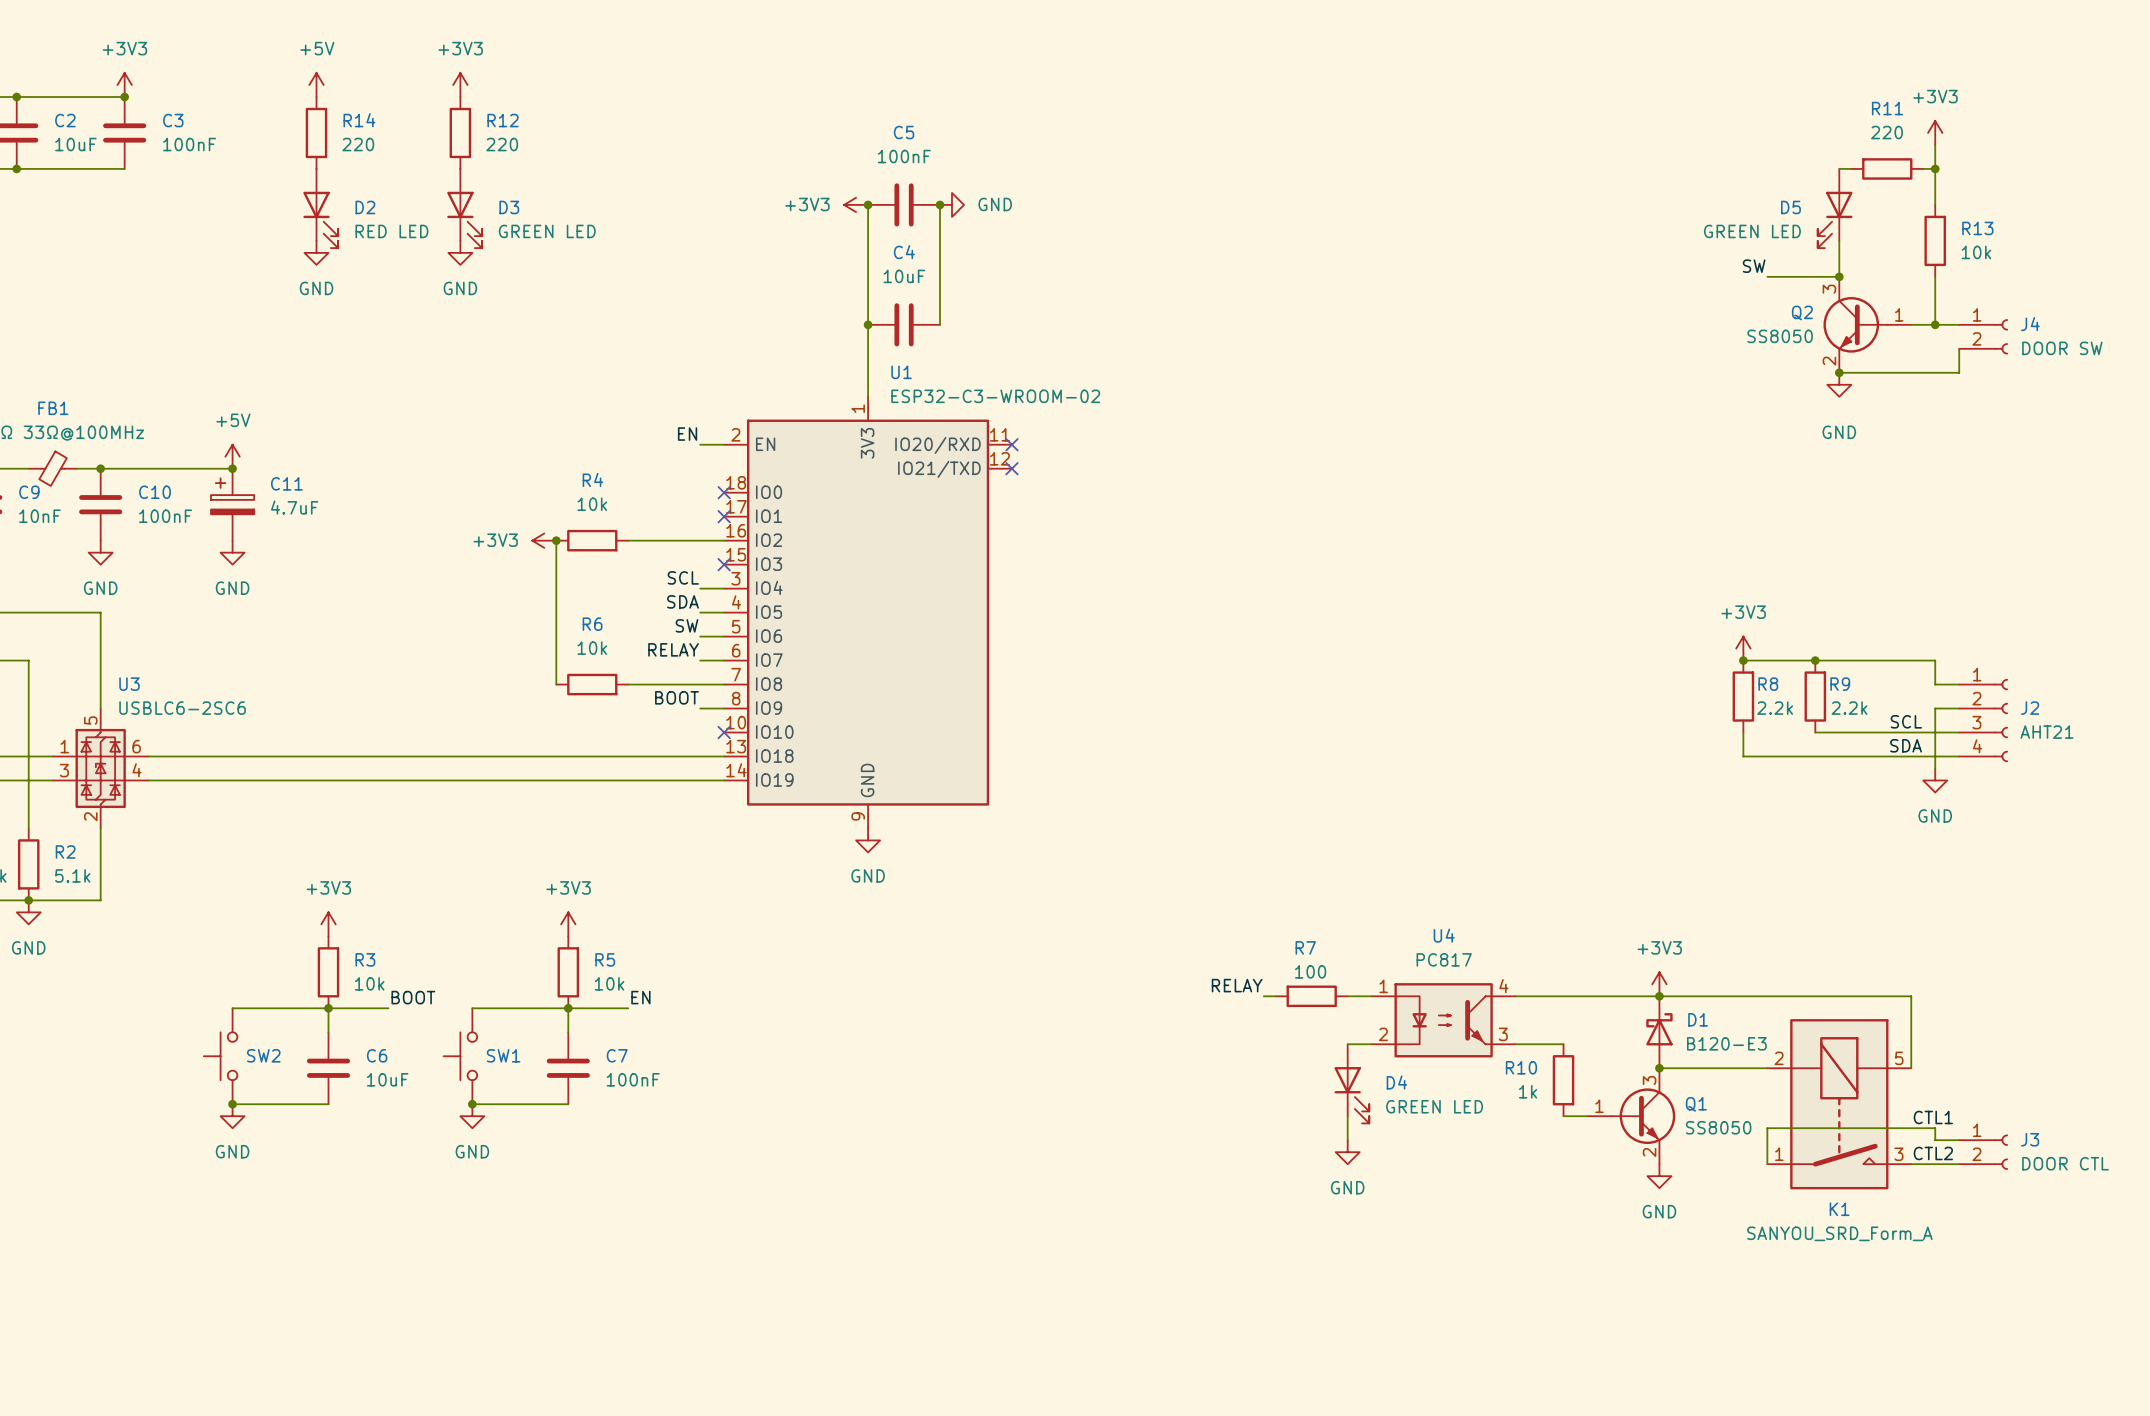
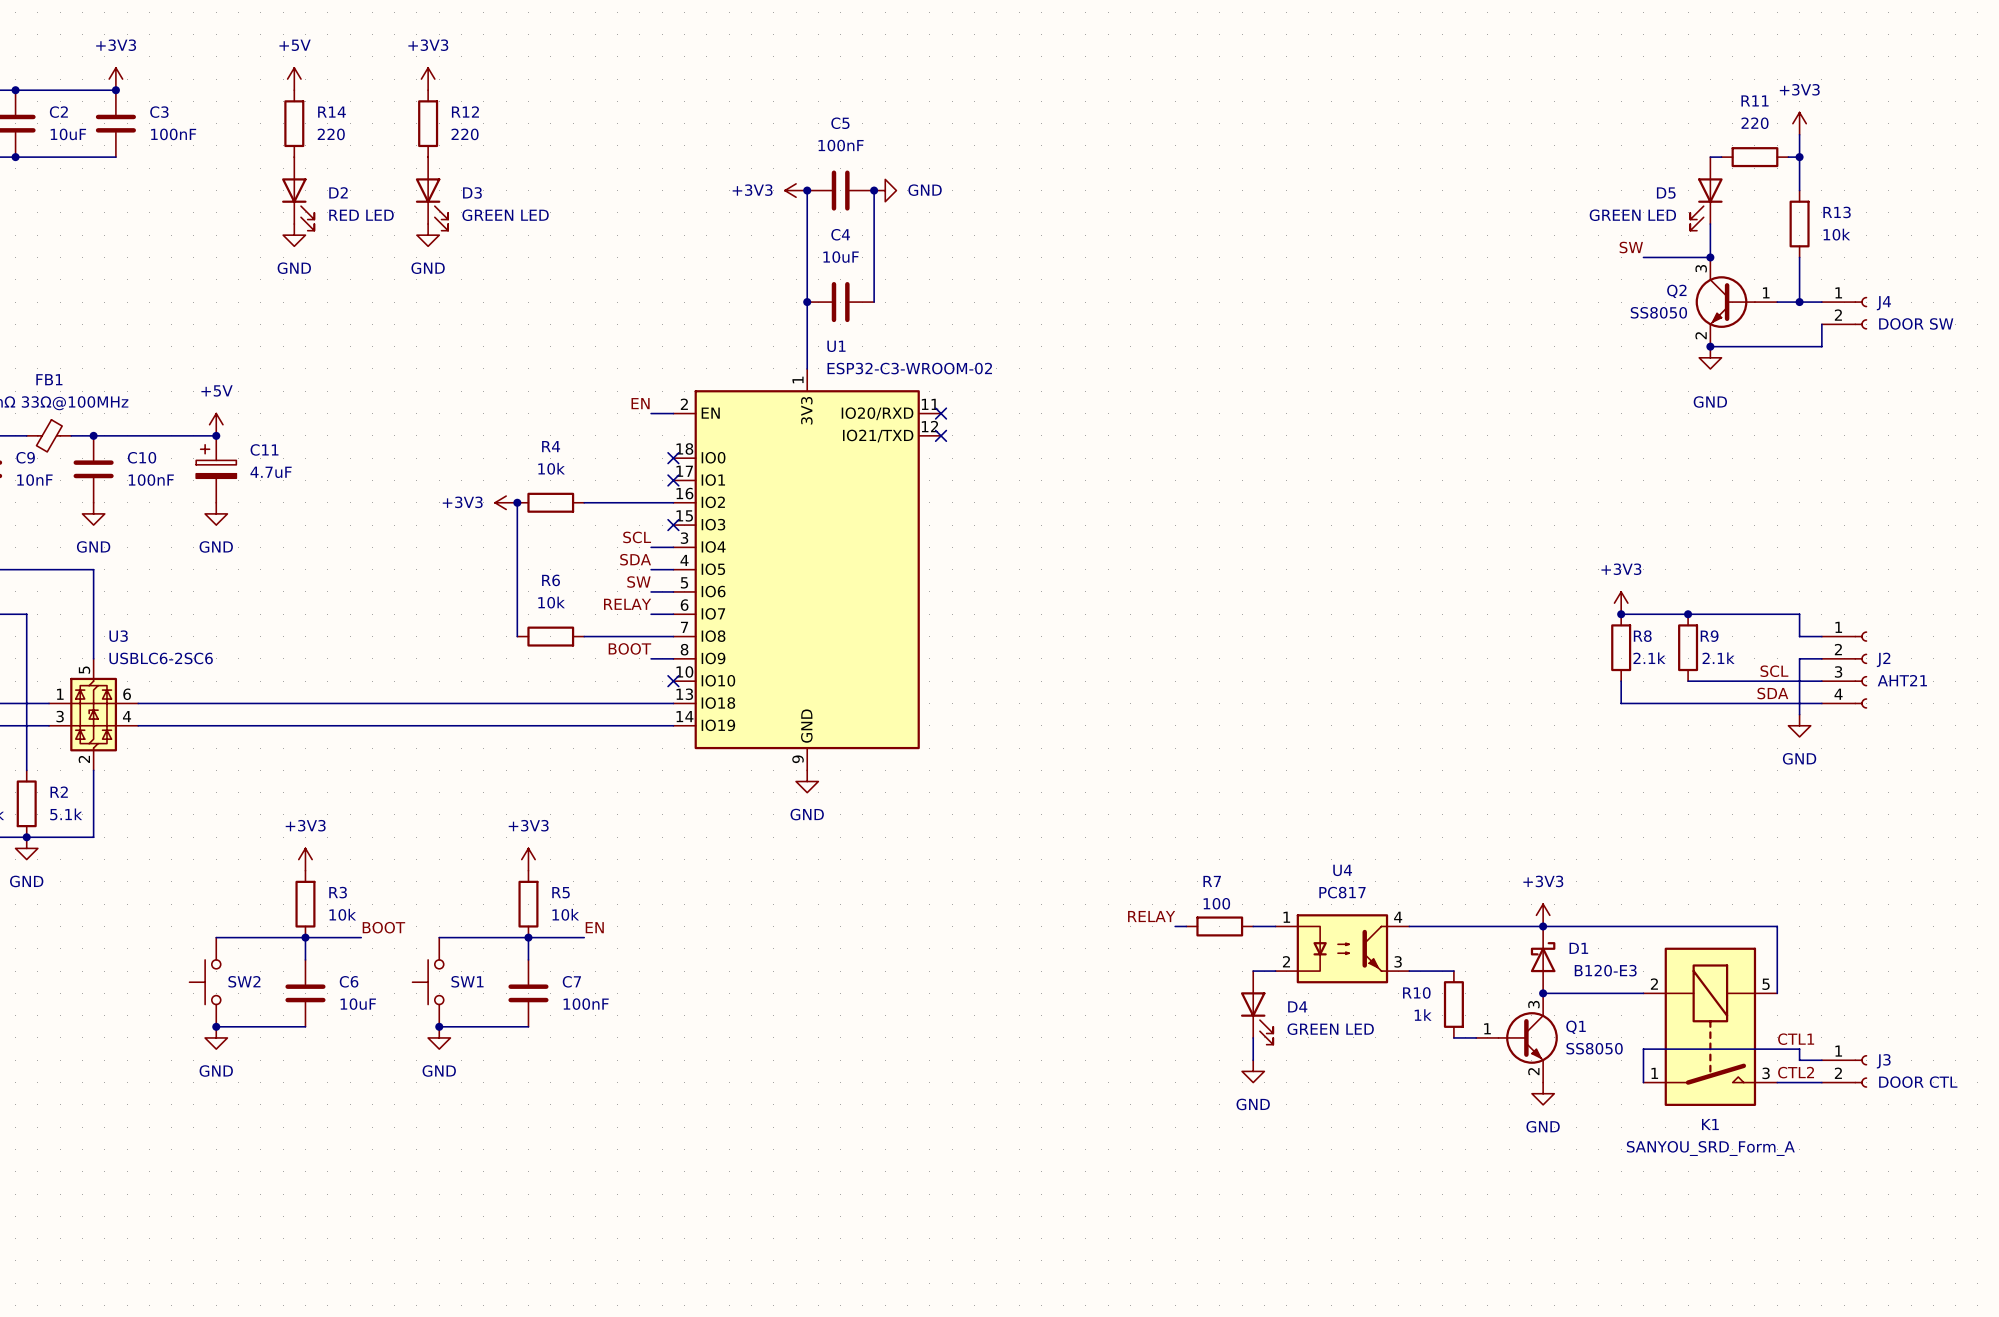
R8 value: 2.2k (1775, 708) -> 2.1k (1649, 658)
R9 value: 2.2k (1849, 708) -> 2.1k (1718, 658)

